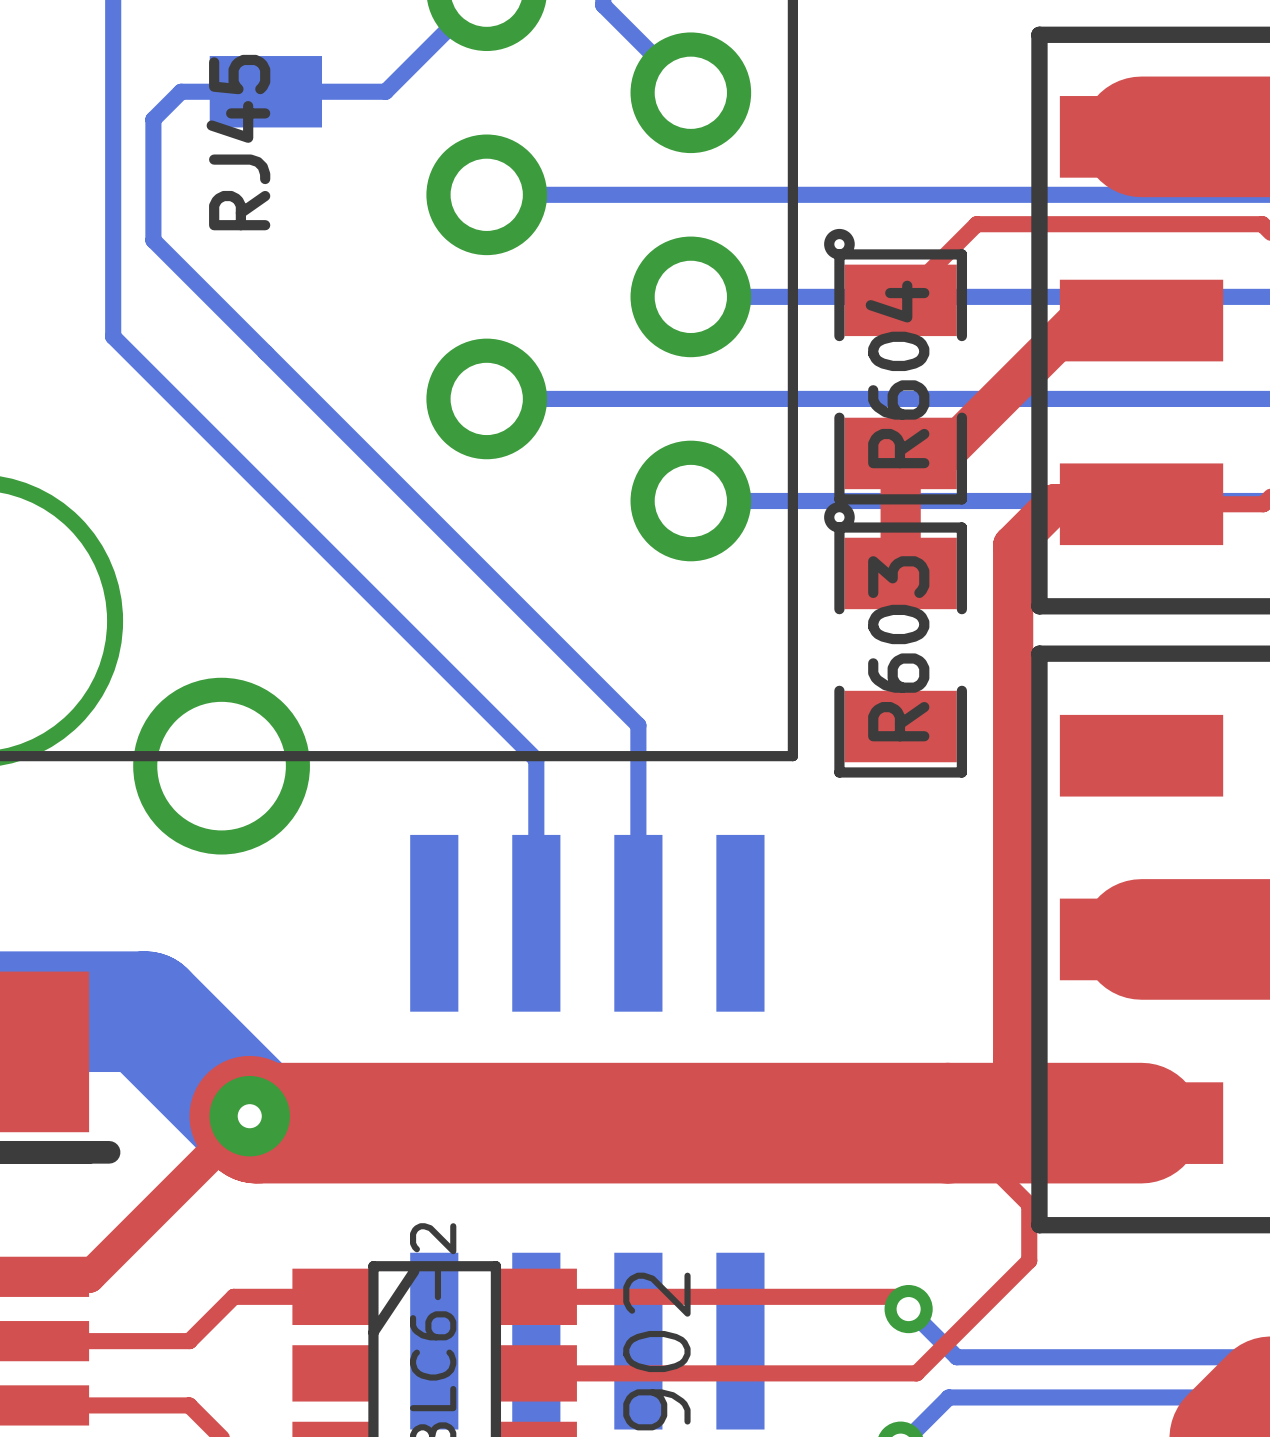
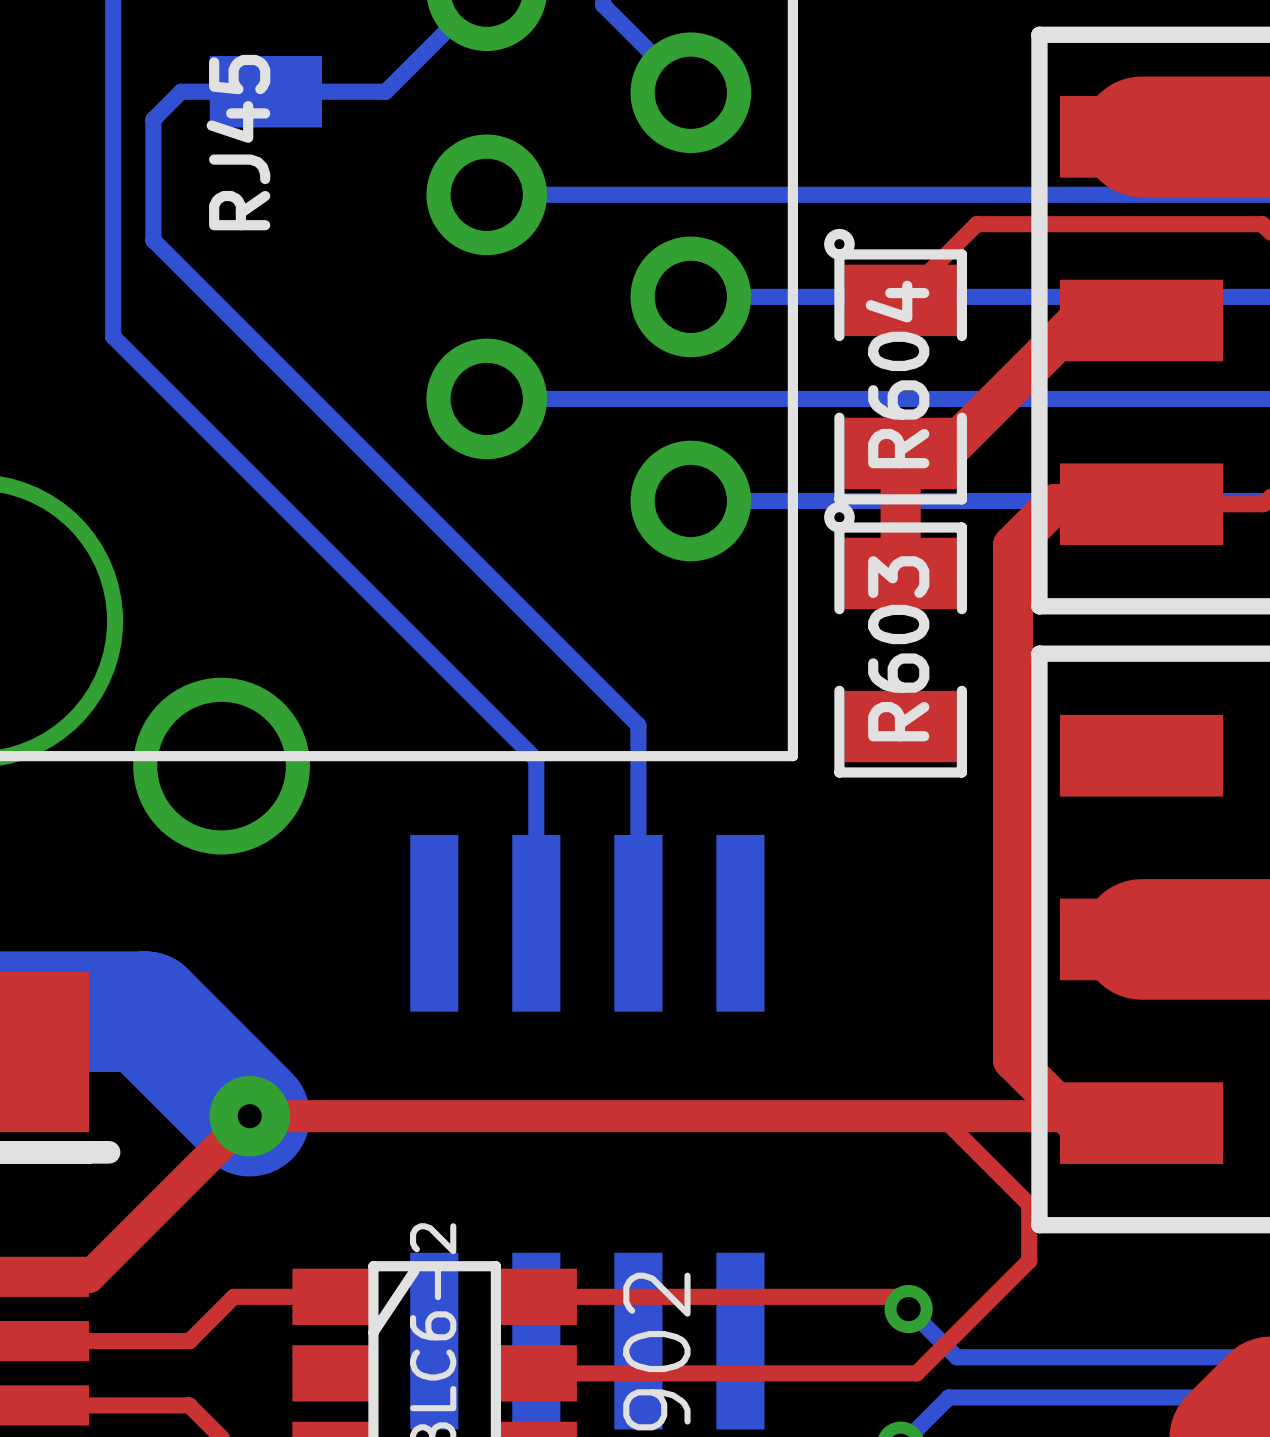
top track: (249, 1116) (256, 1123) (1141, 1123) -> none

